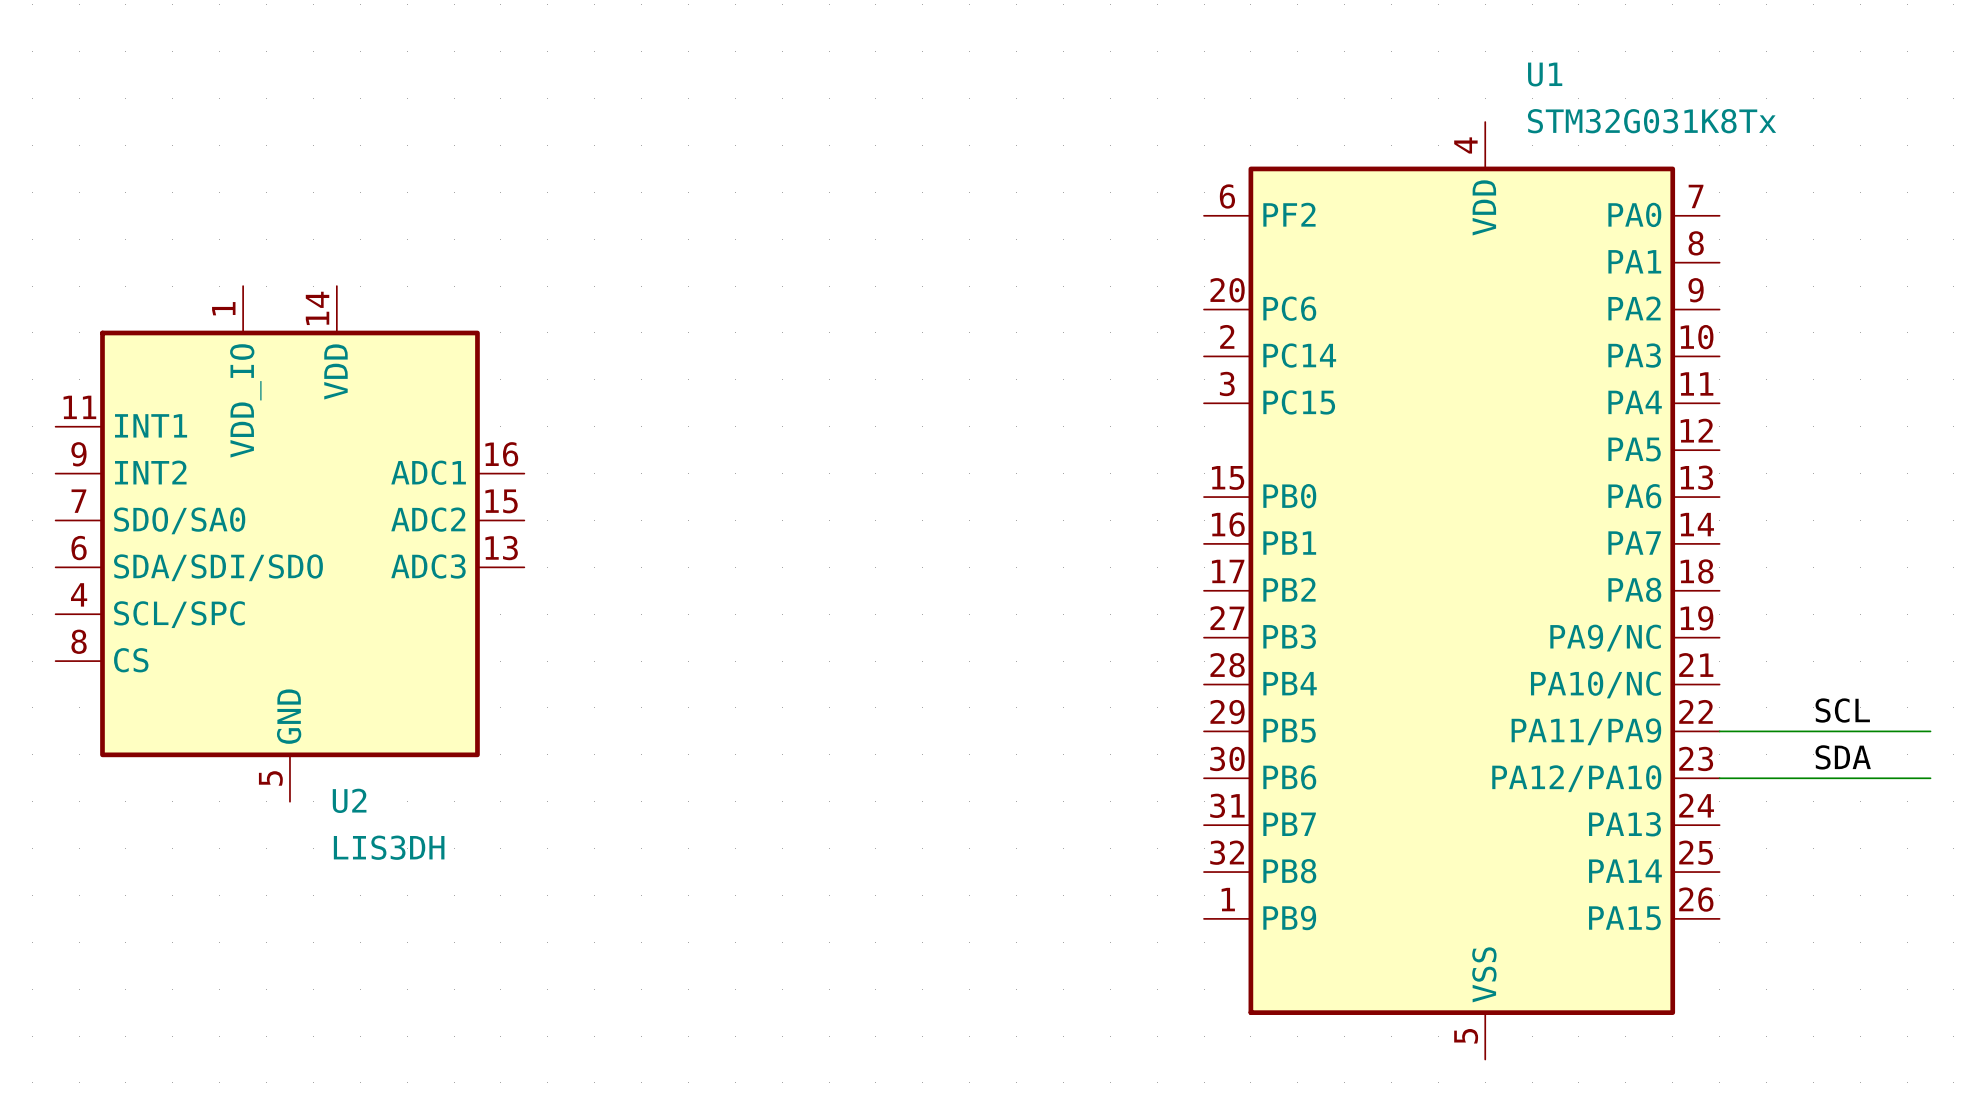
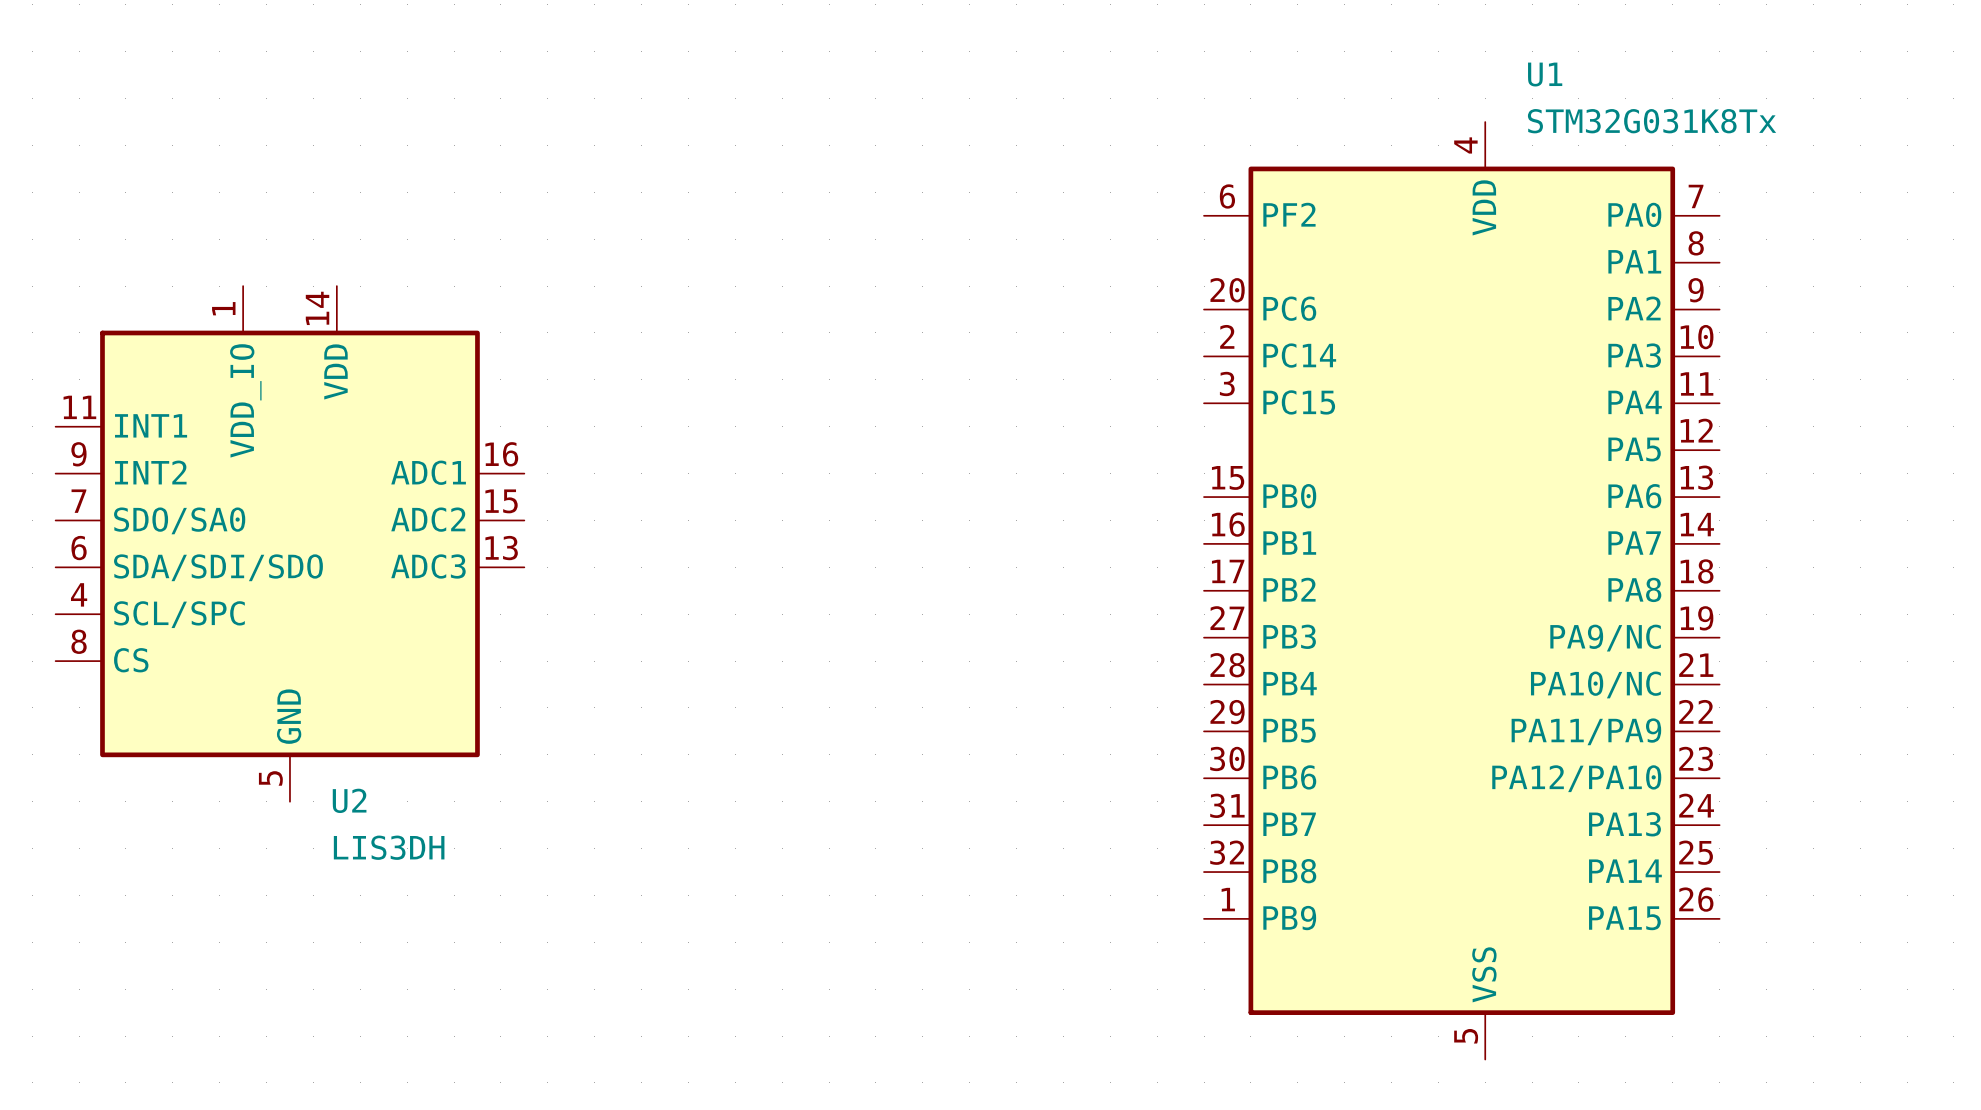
label: SCL (1842, 710) -> none
wire: (1719, 731) (1930, 731) -> none
label: SDA (1843, 757) -> none
wire: (1719, 778) (1930, 778) -> none

